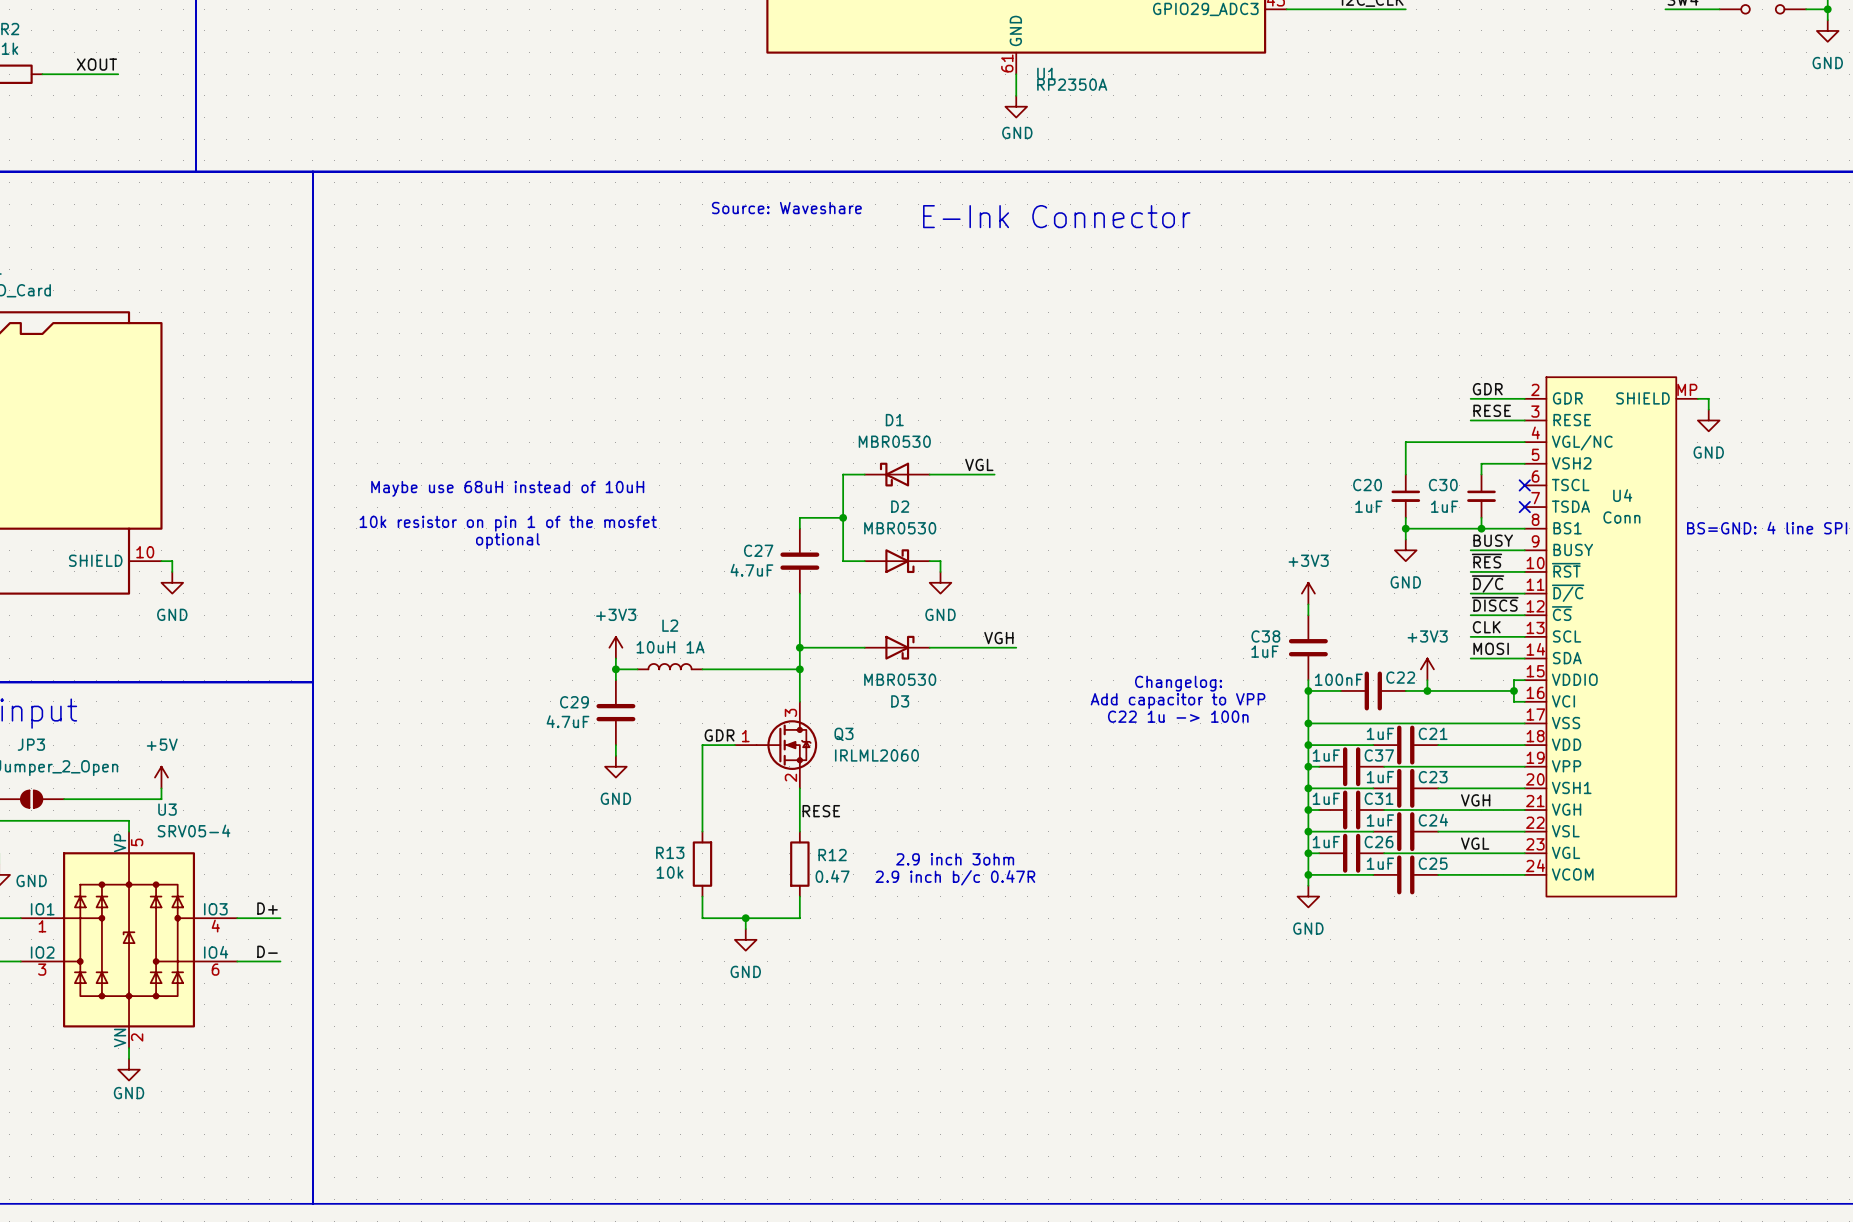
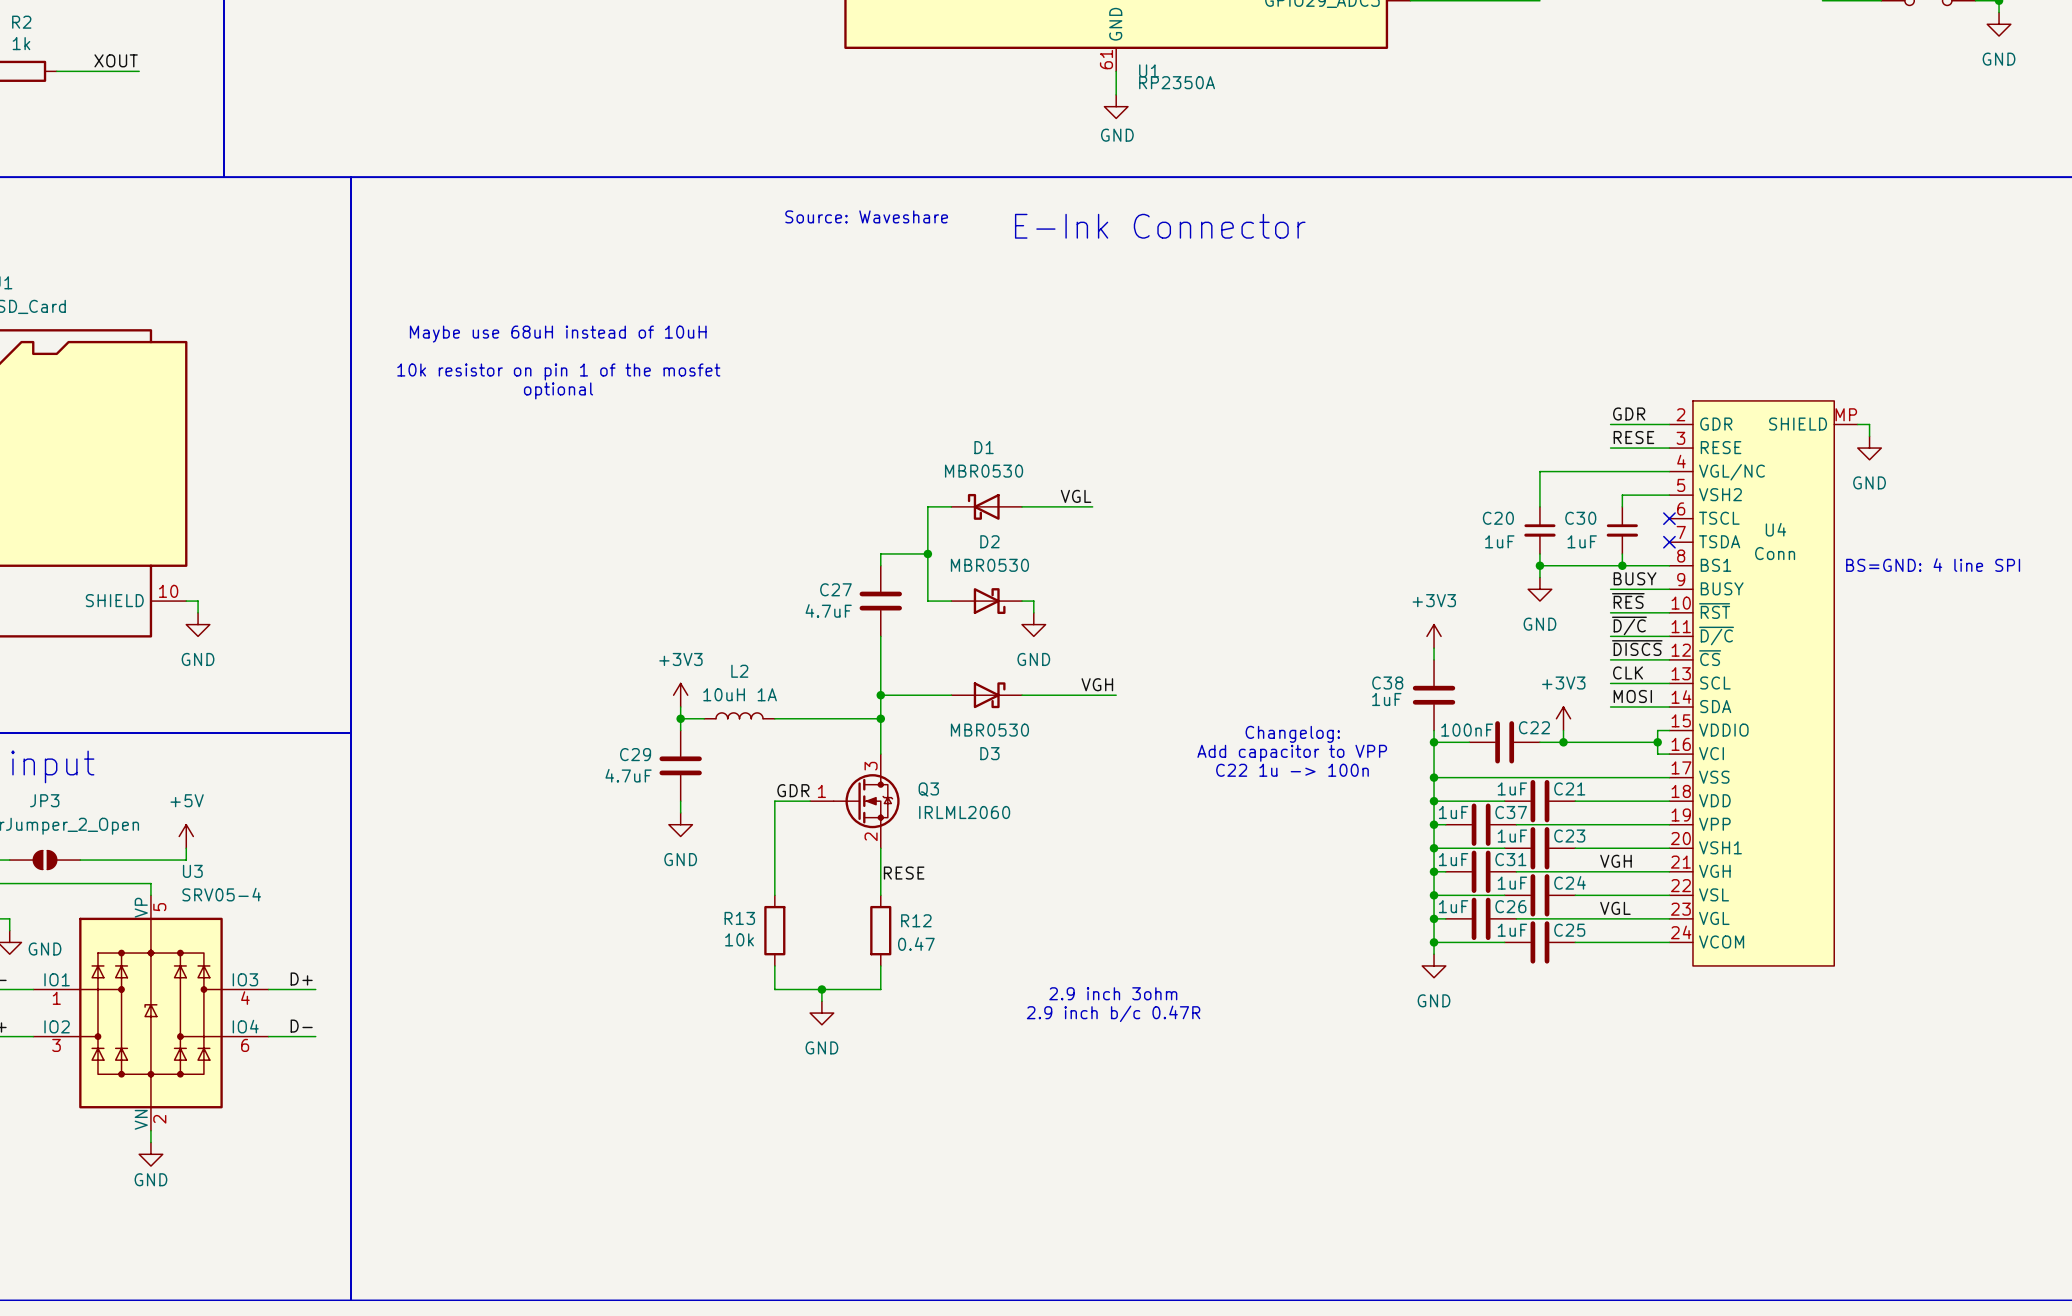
text position: Maybe use 68uH instead of 10uH (507, 488) -> Maybe use 68uH instead of 10uH (558, 334)
text position: 10k resistor on pin 1 of the mosfet (508, 523) -> 10k resistor on pin 1 of the mosfet (558, 371)
text position: optional (507, 541) -> optional (558, 390)
text position: 2.9 inch 3ohm (955, 859) -> 2.9 inch 3ohm (1113, 993)
text position: 2.9 inch b/c 0.47R (955, 877) -> 2.9 inch b/c 0.47R (1113, 1013)

